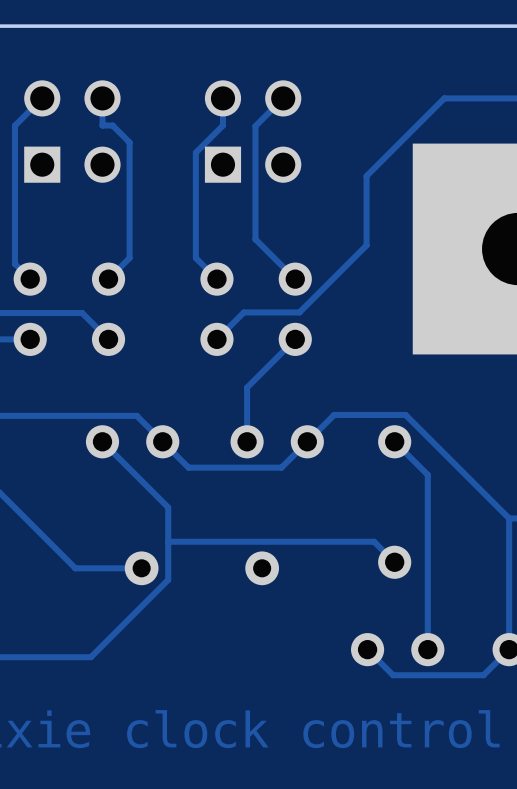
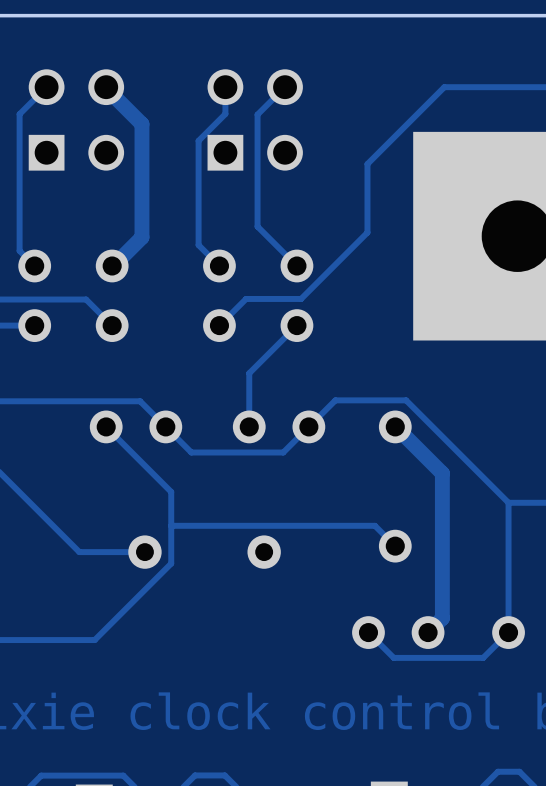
track: (102, 98) (102, 125) (112, 125) (129, 142) (129, 258) (108, 279) -> (106, 88) (141, 124) (141, 237) (112, 265)
track: (394, 441) (427, 474) (427, 649) -> (395, 426) (442, 473) (442, 618) (428, 632)

